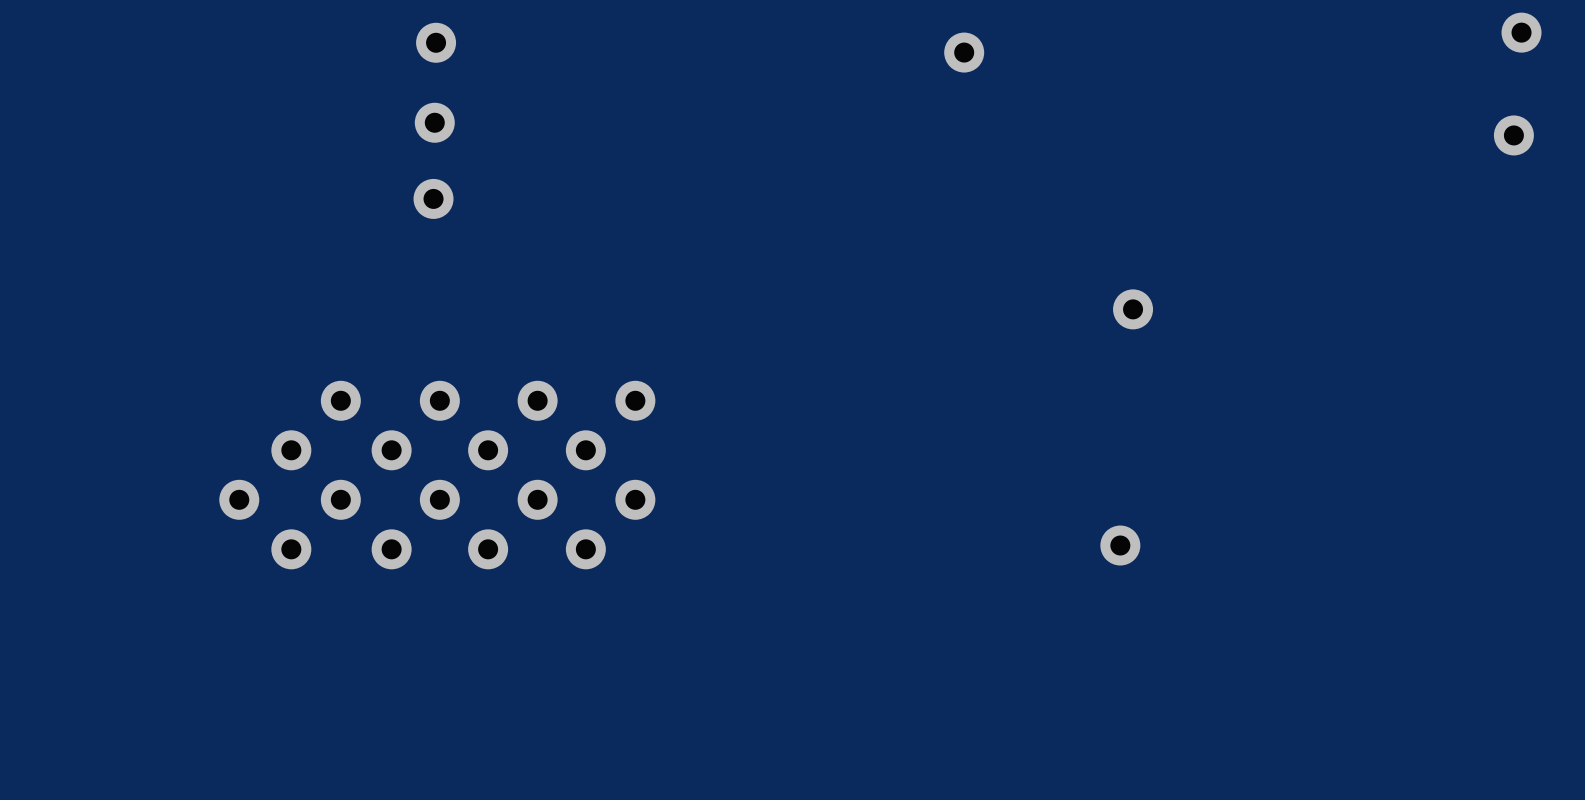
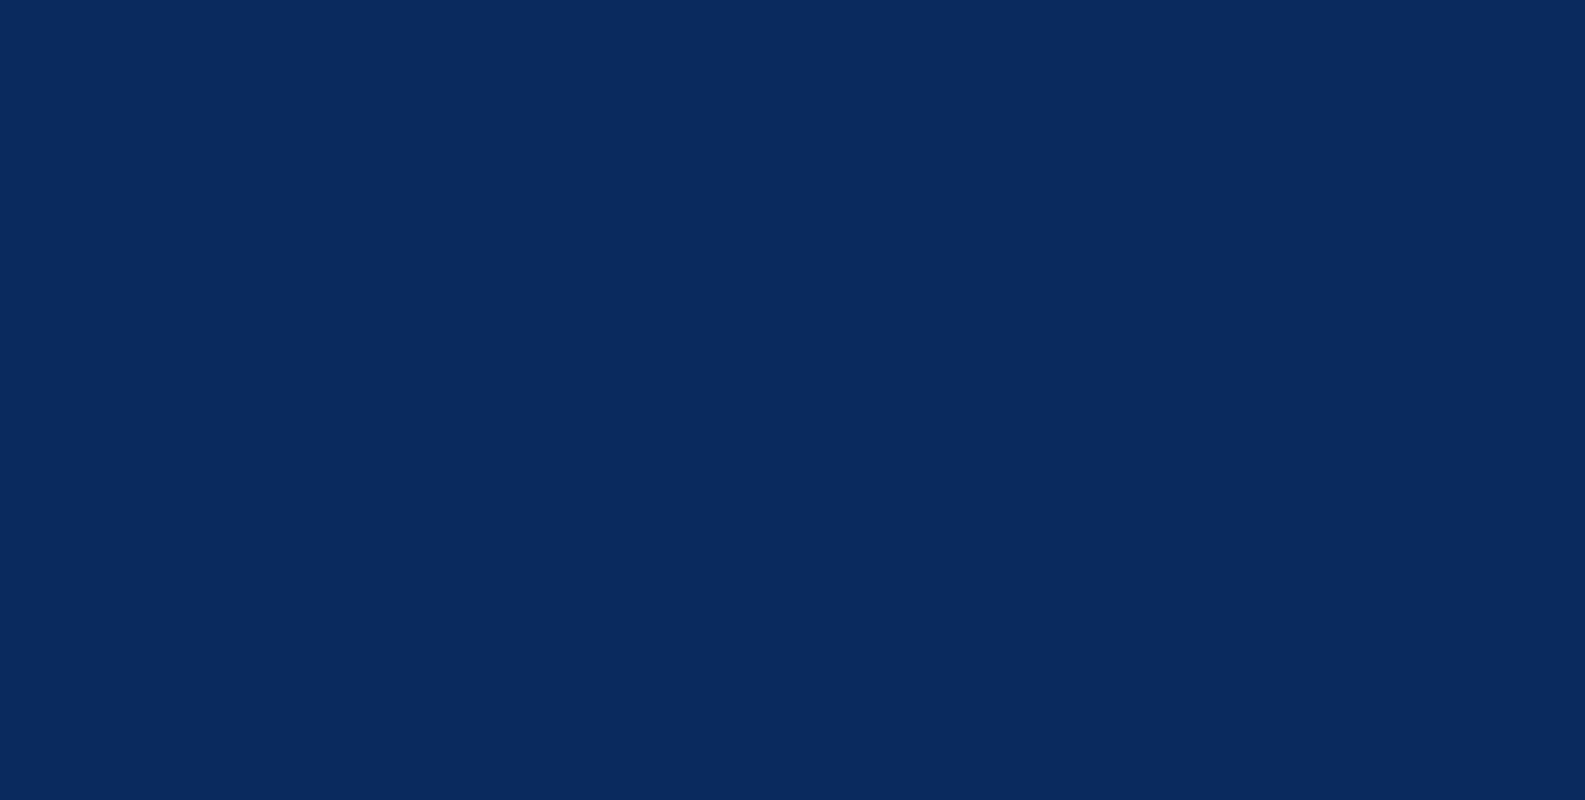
via: (1521, 32) -> none
via: (436, 42) -> none
via: (964, 52) -> none
via: (434, 122) -> none
via: (1513, 135) -> none
via: (433, 198) -> none
via: (1133, 309) -> none
via: (340, 400) -> none
via: (439, 400) -> none
via: (537, 400) -> none
via: (635, 400) -> none
via: (291, 450) -> none
via: (391, 450) -> none
via: (488, 450) -> none
via: (585, 450) -> none
via: (239, 499) -> none
via: (340, 499) -> none
via: (439, 499) -> none
via: (537, 499) -> none
via: (635, 499) -> none
via: (1120, 545) -> none
via: (291, 549) -> none
via: (391, 549) -> none
via: (488, 549) -> none
via: (585, 549) -> none

